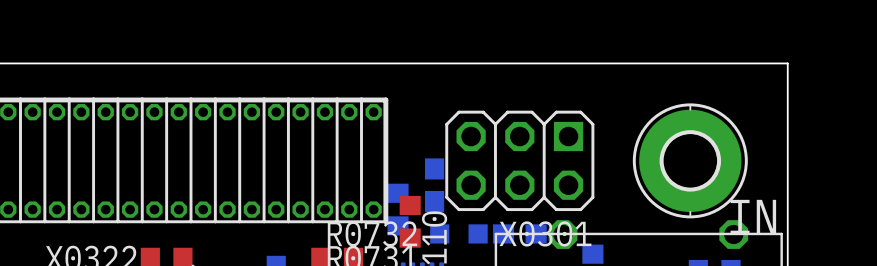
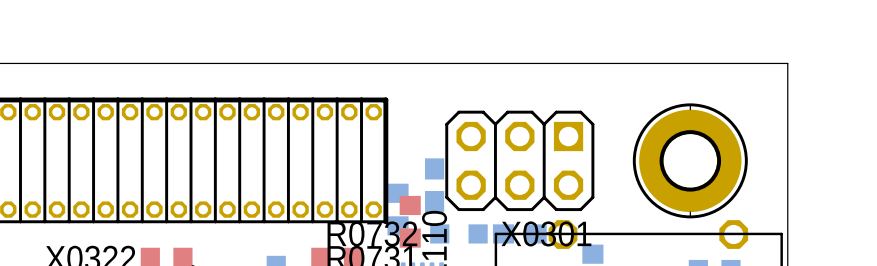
text: IN (753, 216) -> none

